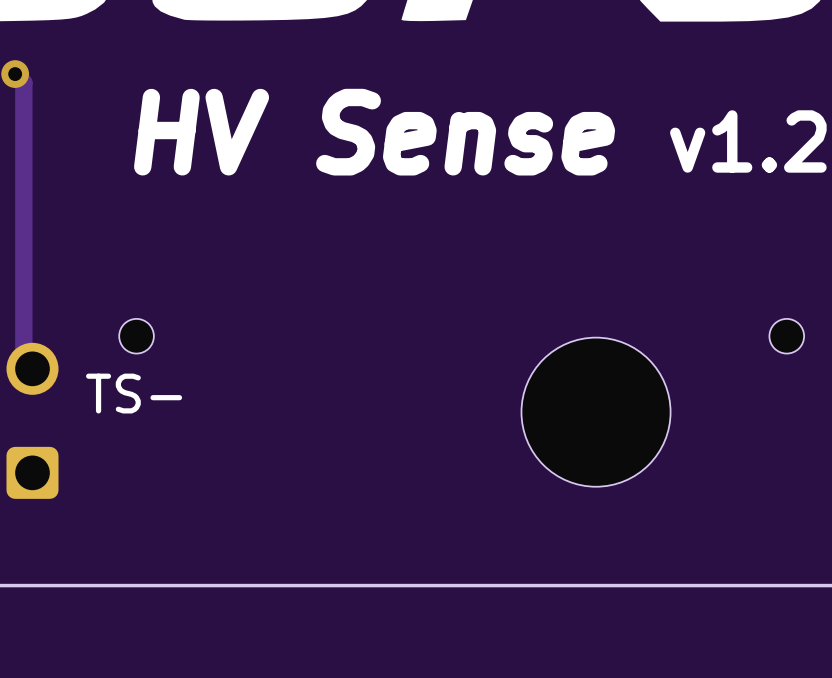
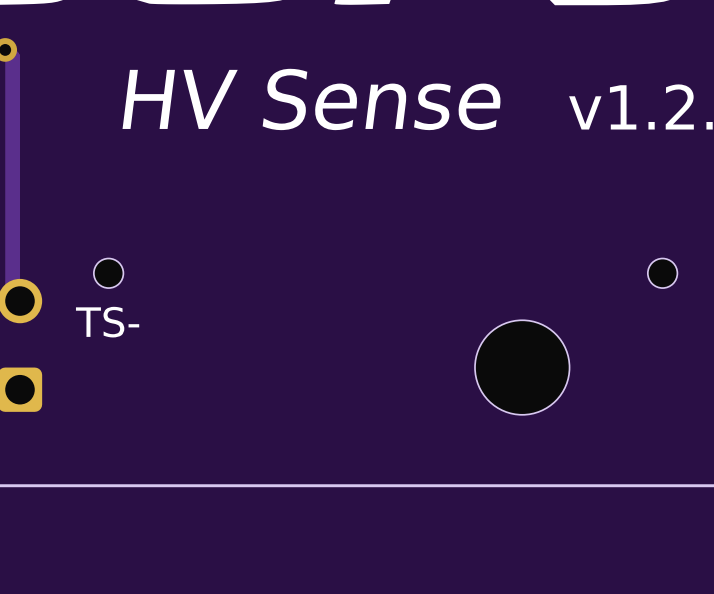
part: (596, 412) -> none
part: none -> (522, 367)

